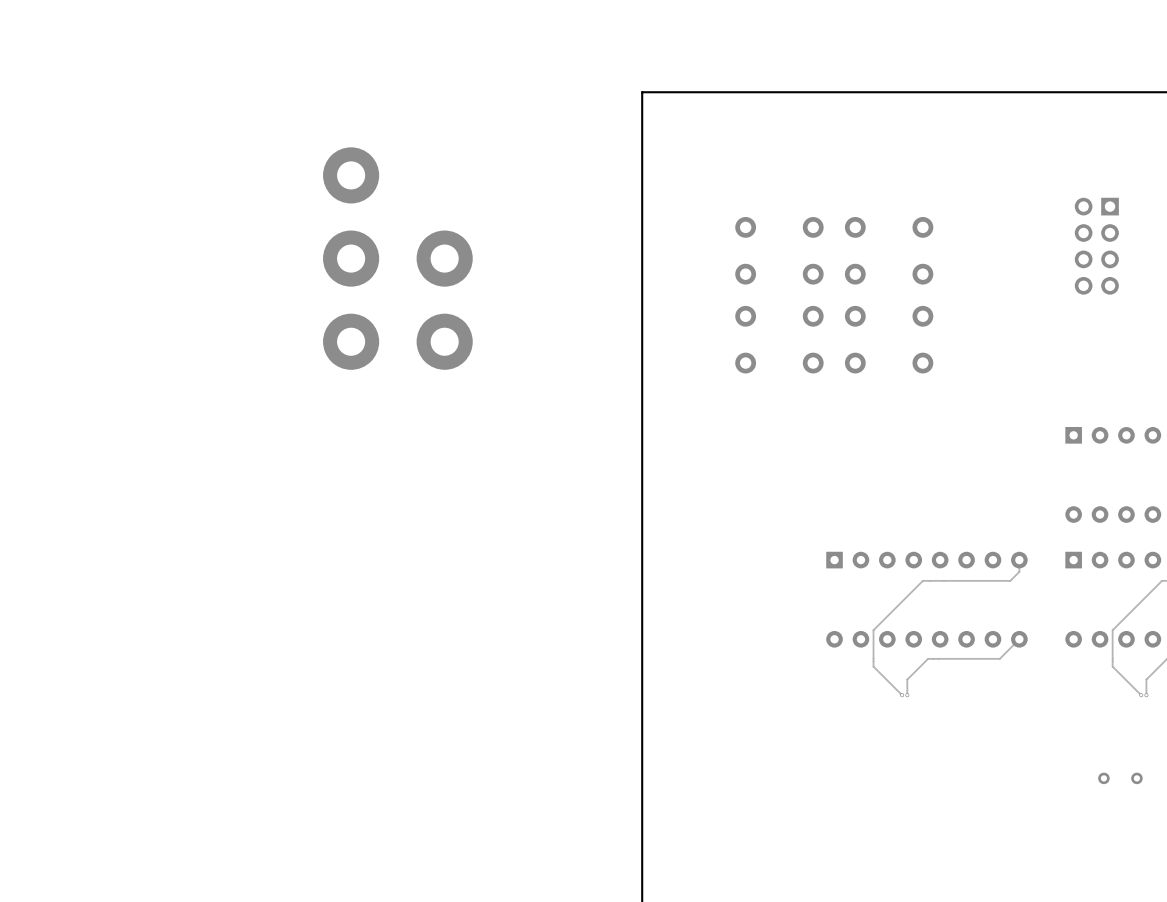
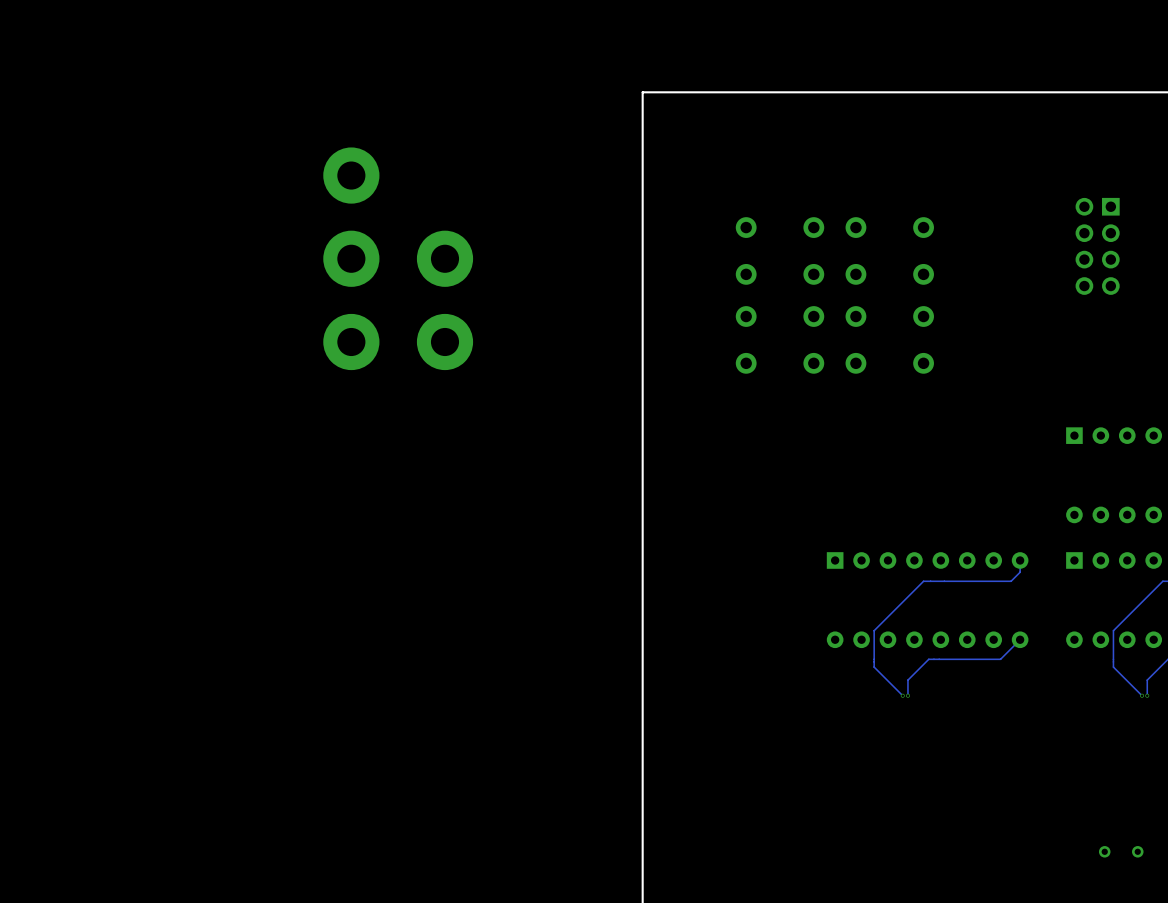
part position: (1120, 778) -> (1121, 851)

